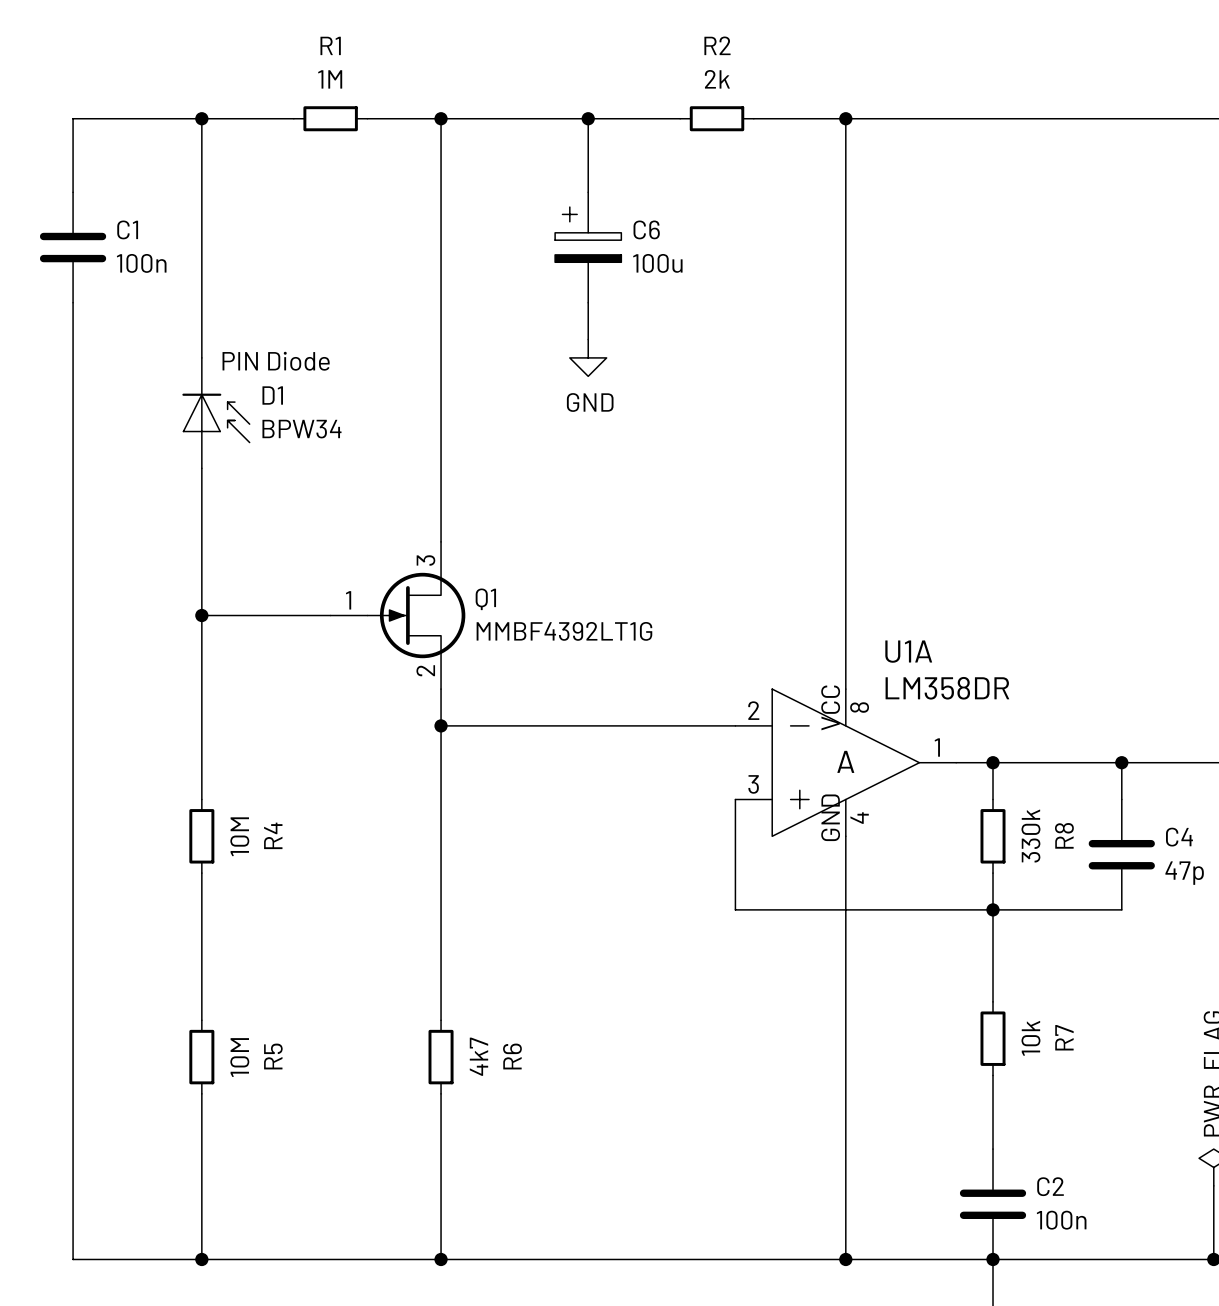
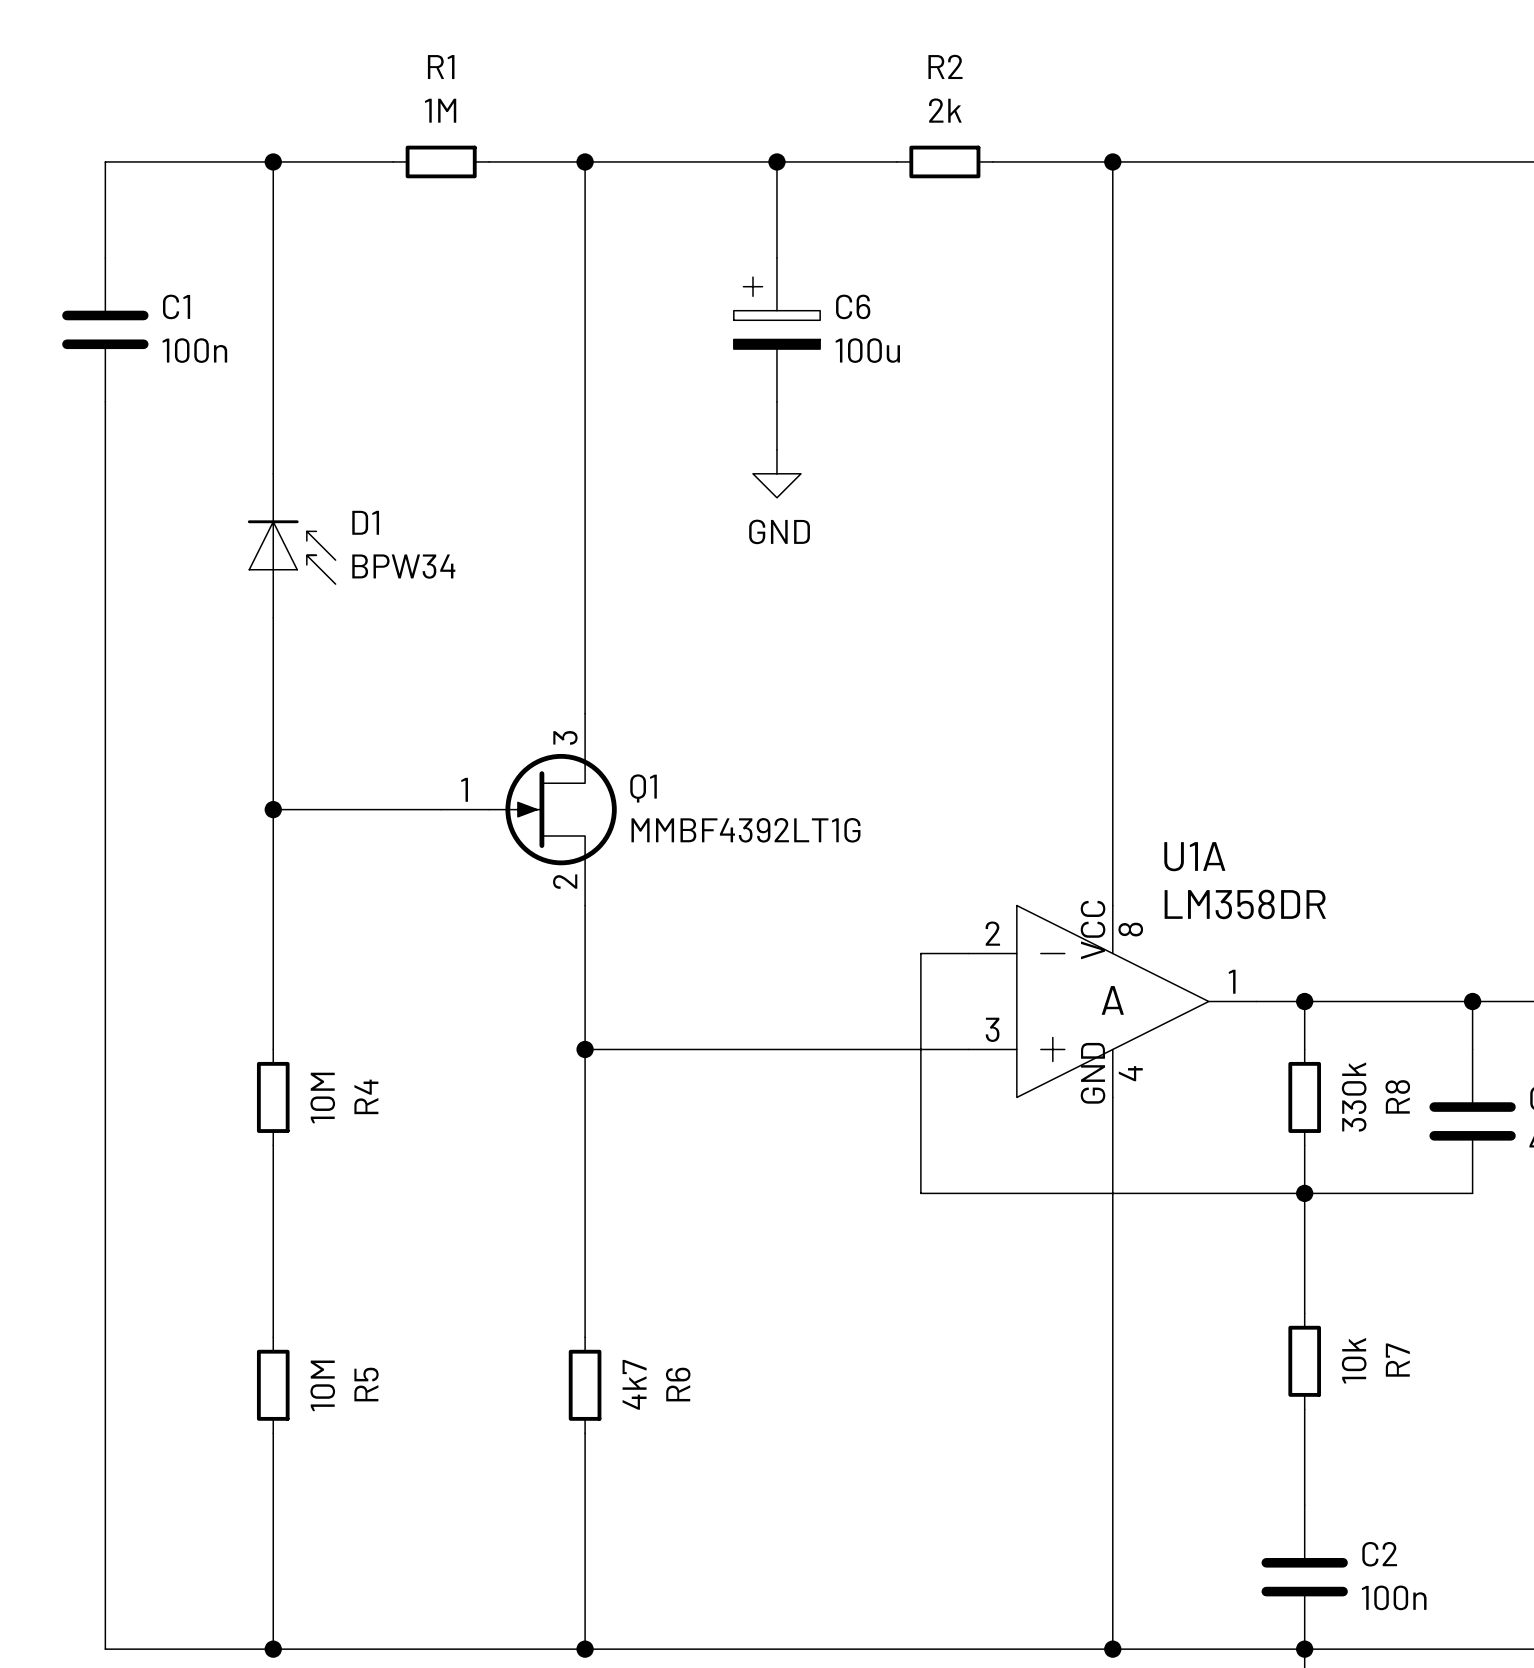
text: PIN Diode (276, 361) -> none
wire: (441, 725) (698, 725) -> none
junction position: (441, 725) -> (585, 1049)
wire: none -> (585, 1049) (968, 1049)
wire: (735, 799) (735, 909) -> (920, 953) (920, 1193) (968, 1193)

